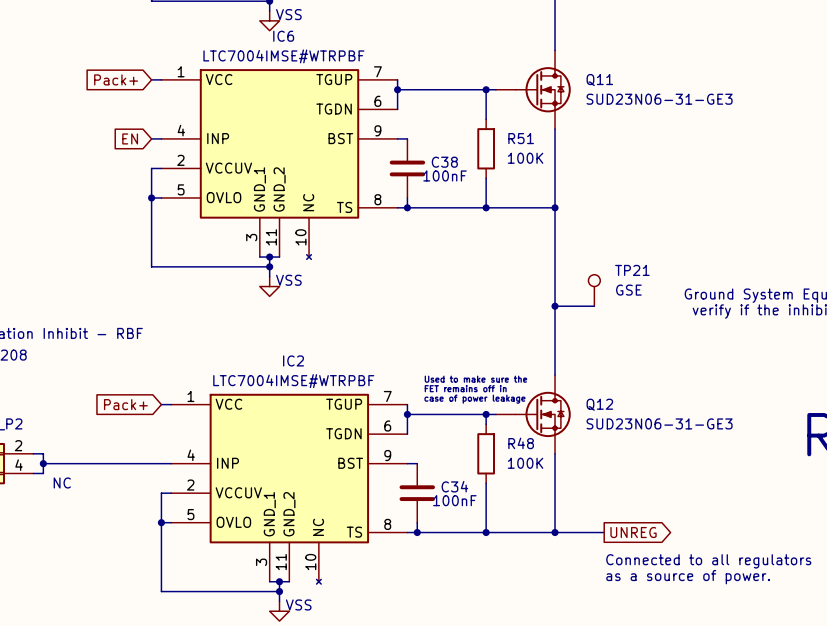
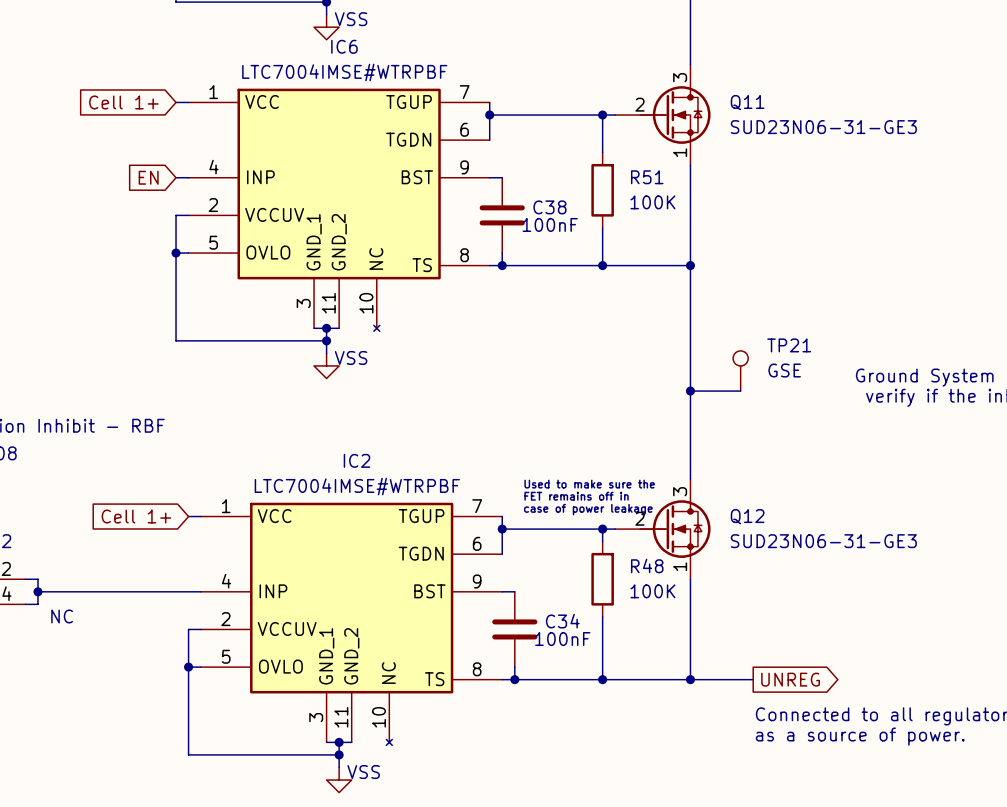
Q11 symbol: [495, 50, 571, 130] -> [615, 64, 711, 166]
global label: Pack+ (116, 79) -> Cell 1+ (123, 102)
Q12 symbol: [495, 375, 571, 454] -> [615, 478, 711, 580]
global label: Pack+ (125, 404) -> Cell 1+ (136, 516)

